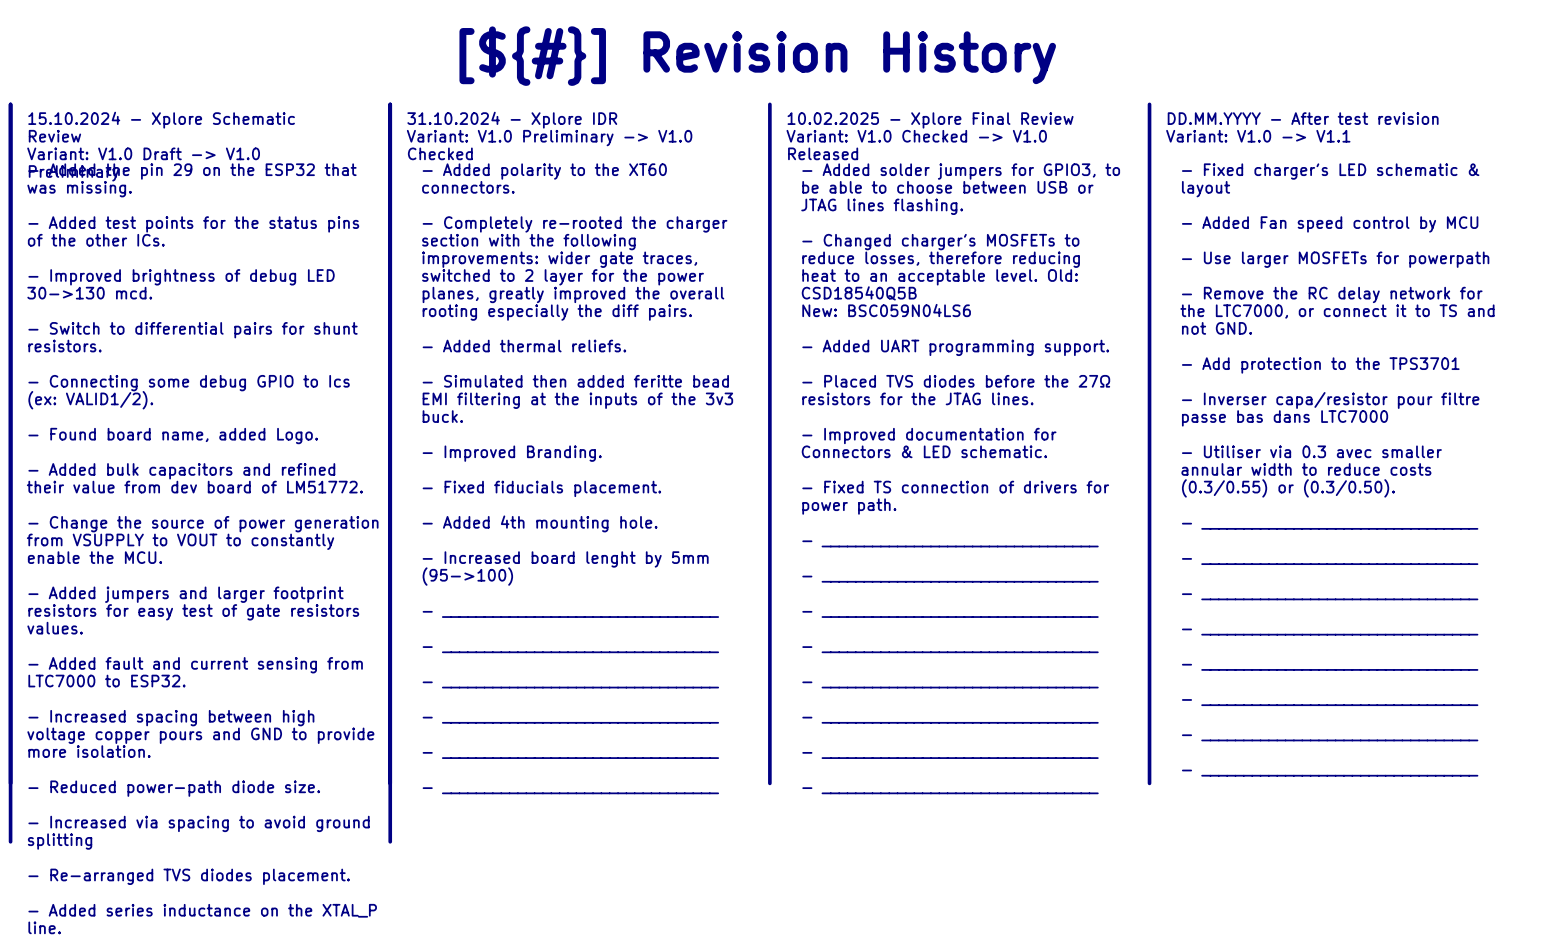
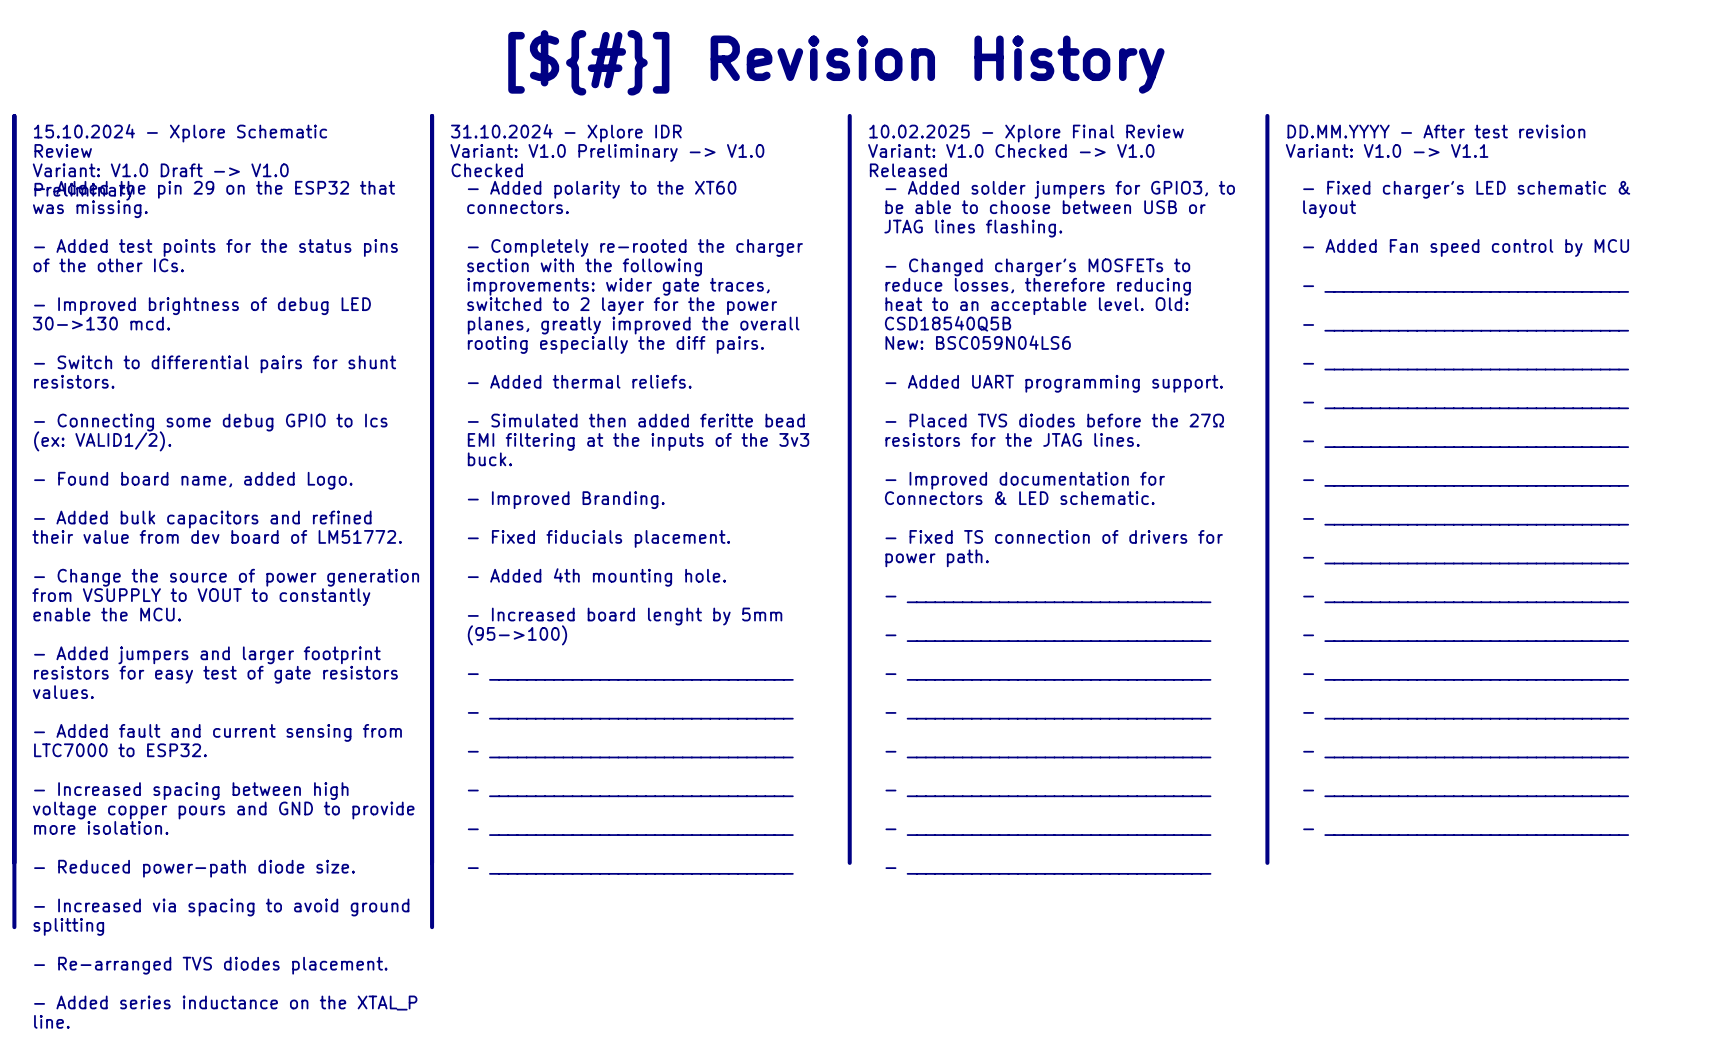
text: - Use larger MOSFETs for powerpath (1335, 259) -> - _________________________________ (1466, 289)
text: - Remove the RC delay network for (1332, 294) -> - _________________________________ (1466, 327)
text: the LTC7000, or connect it to TS and (1337, 311) -> none
text: not GND. (1216, 328) -> - _________________________________ (1466, 366)
text: - Add protection to the TPS3701 (1320, 365) -> - _________________________________ (1466, 405)
text: - Inverser capa/resistor pour filtre (1330, 400) -> - _________________________________ (1466, 444)
text: passe bas dans LTC7000 (1285, 418) -> none
text: none -> - _________________________________ (1466, 483)
text: - Utiliser via 0.3 avec smaller (1311, 451) -> none
text: annular width to reduce costs (1306, 469) -> - _________________________________ (1466, 521)
text: (0.3/0.55) or (0.3/0.50). (1288, 488) -> none
text: none -> - _________________________________ (1466, 560)
text: - _________________________________ (1330, 526) -> none
text: none -> - _________________________________ (1466, 599)
text: - _________________________________ (1330, 561) -> none
text: none -> - _________________________________ (1466, 638)
text: - _________________________________ (1330, 596) -> none
text: none -> - _________________________________ (1466, 677)
text: - _________________________________ (1330, 632) -> none
text: none -> - _________________________________ (1466, 715)
text: - _________________________________ (1330, 667) -> none
text: none -> - _________________________________ (1466, 754)
text: - _________________________________ (1330, 702) -> none
text: none -> - _________________________________ (1466, 793)
text: - _________________________________ (1330, 737) -> none
text: none -> - _________________________________ (1466, 832)
text: - _________________________________ (1330, 773) -> none

